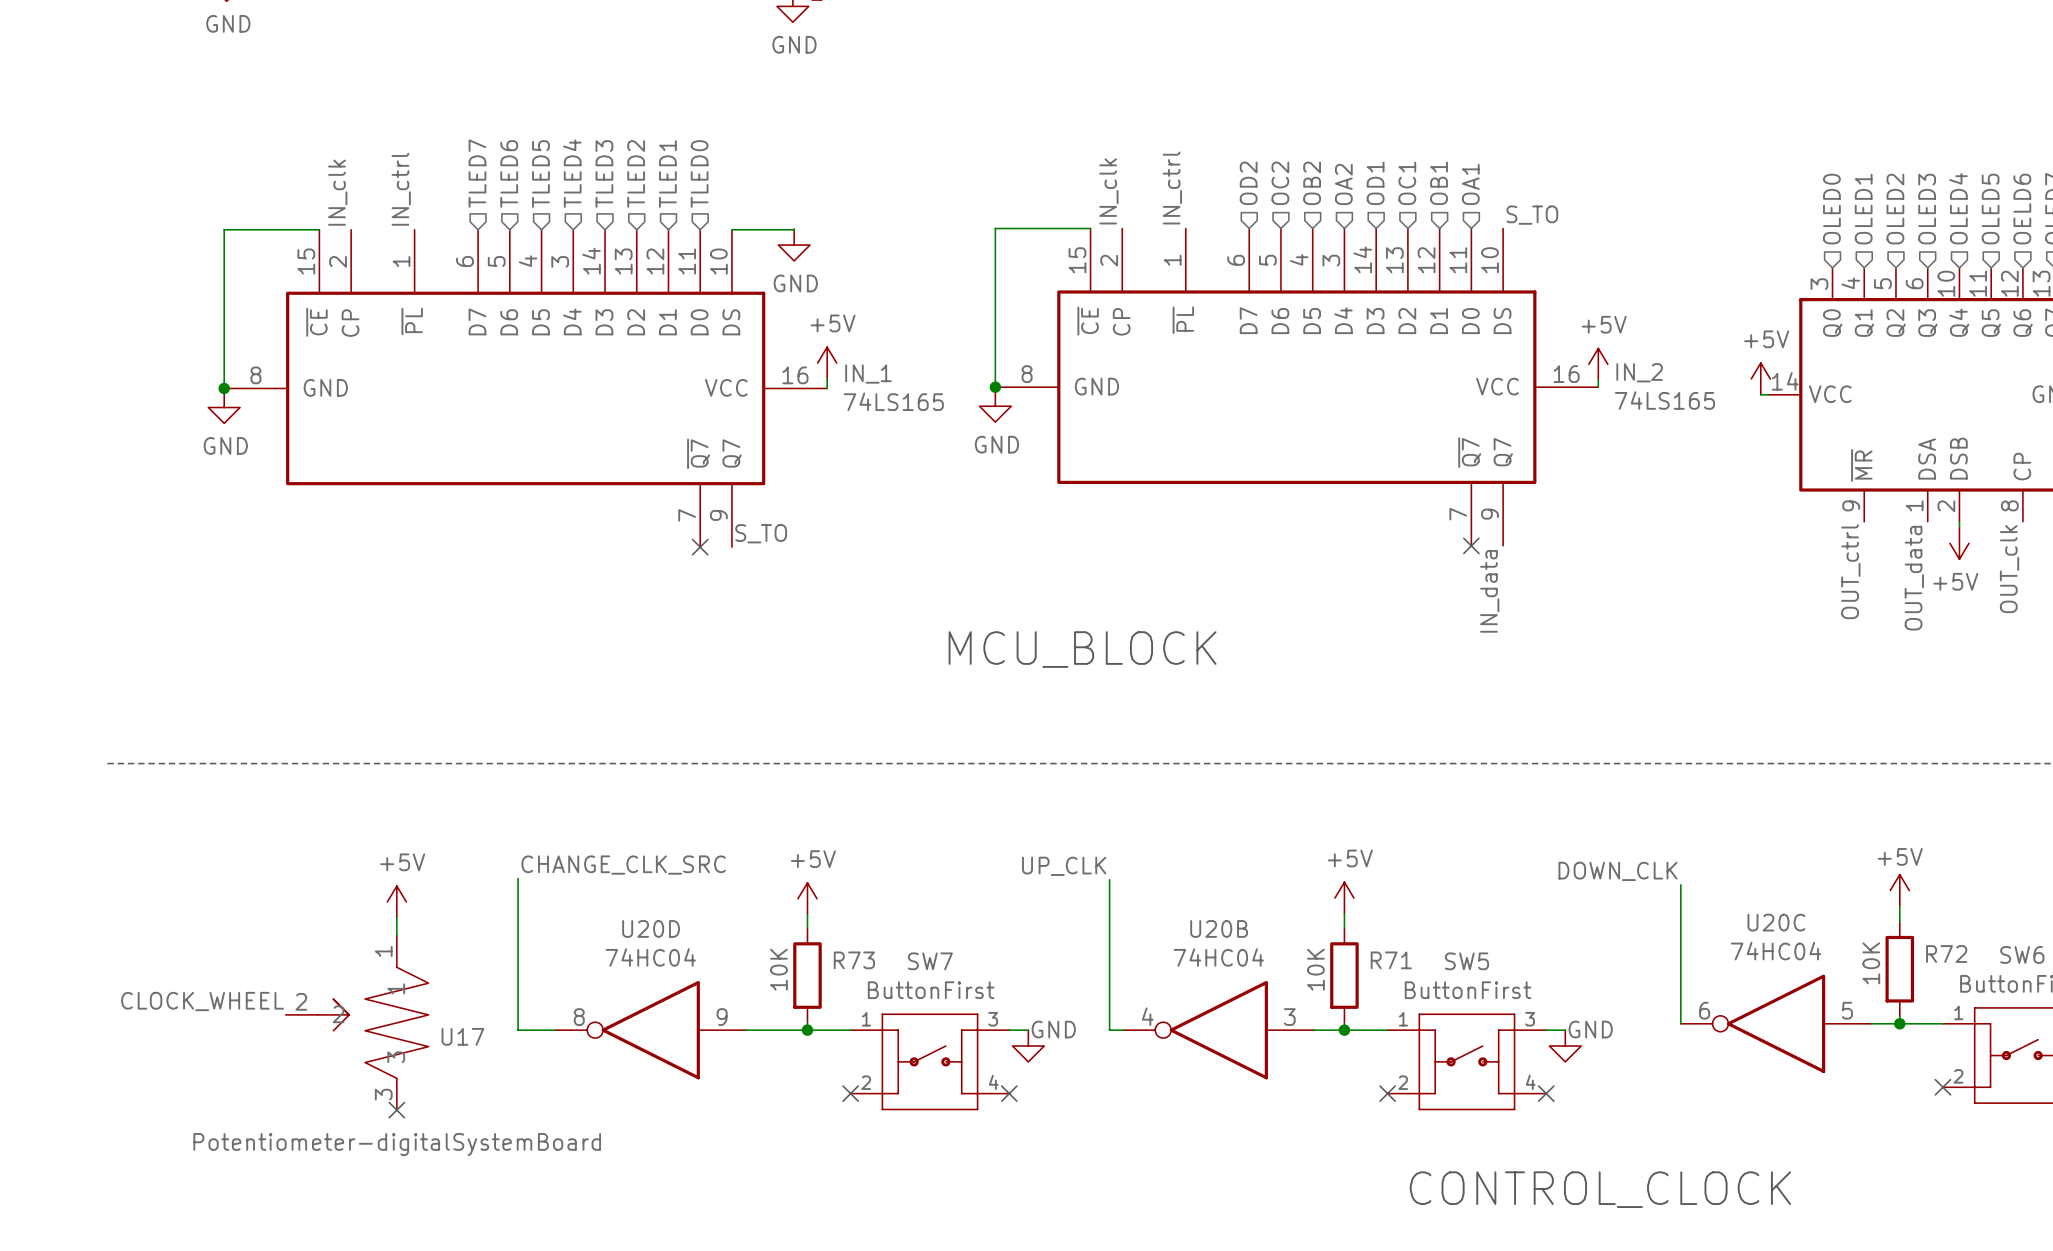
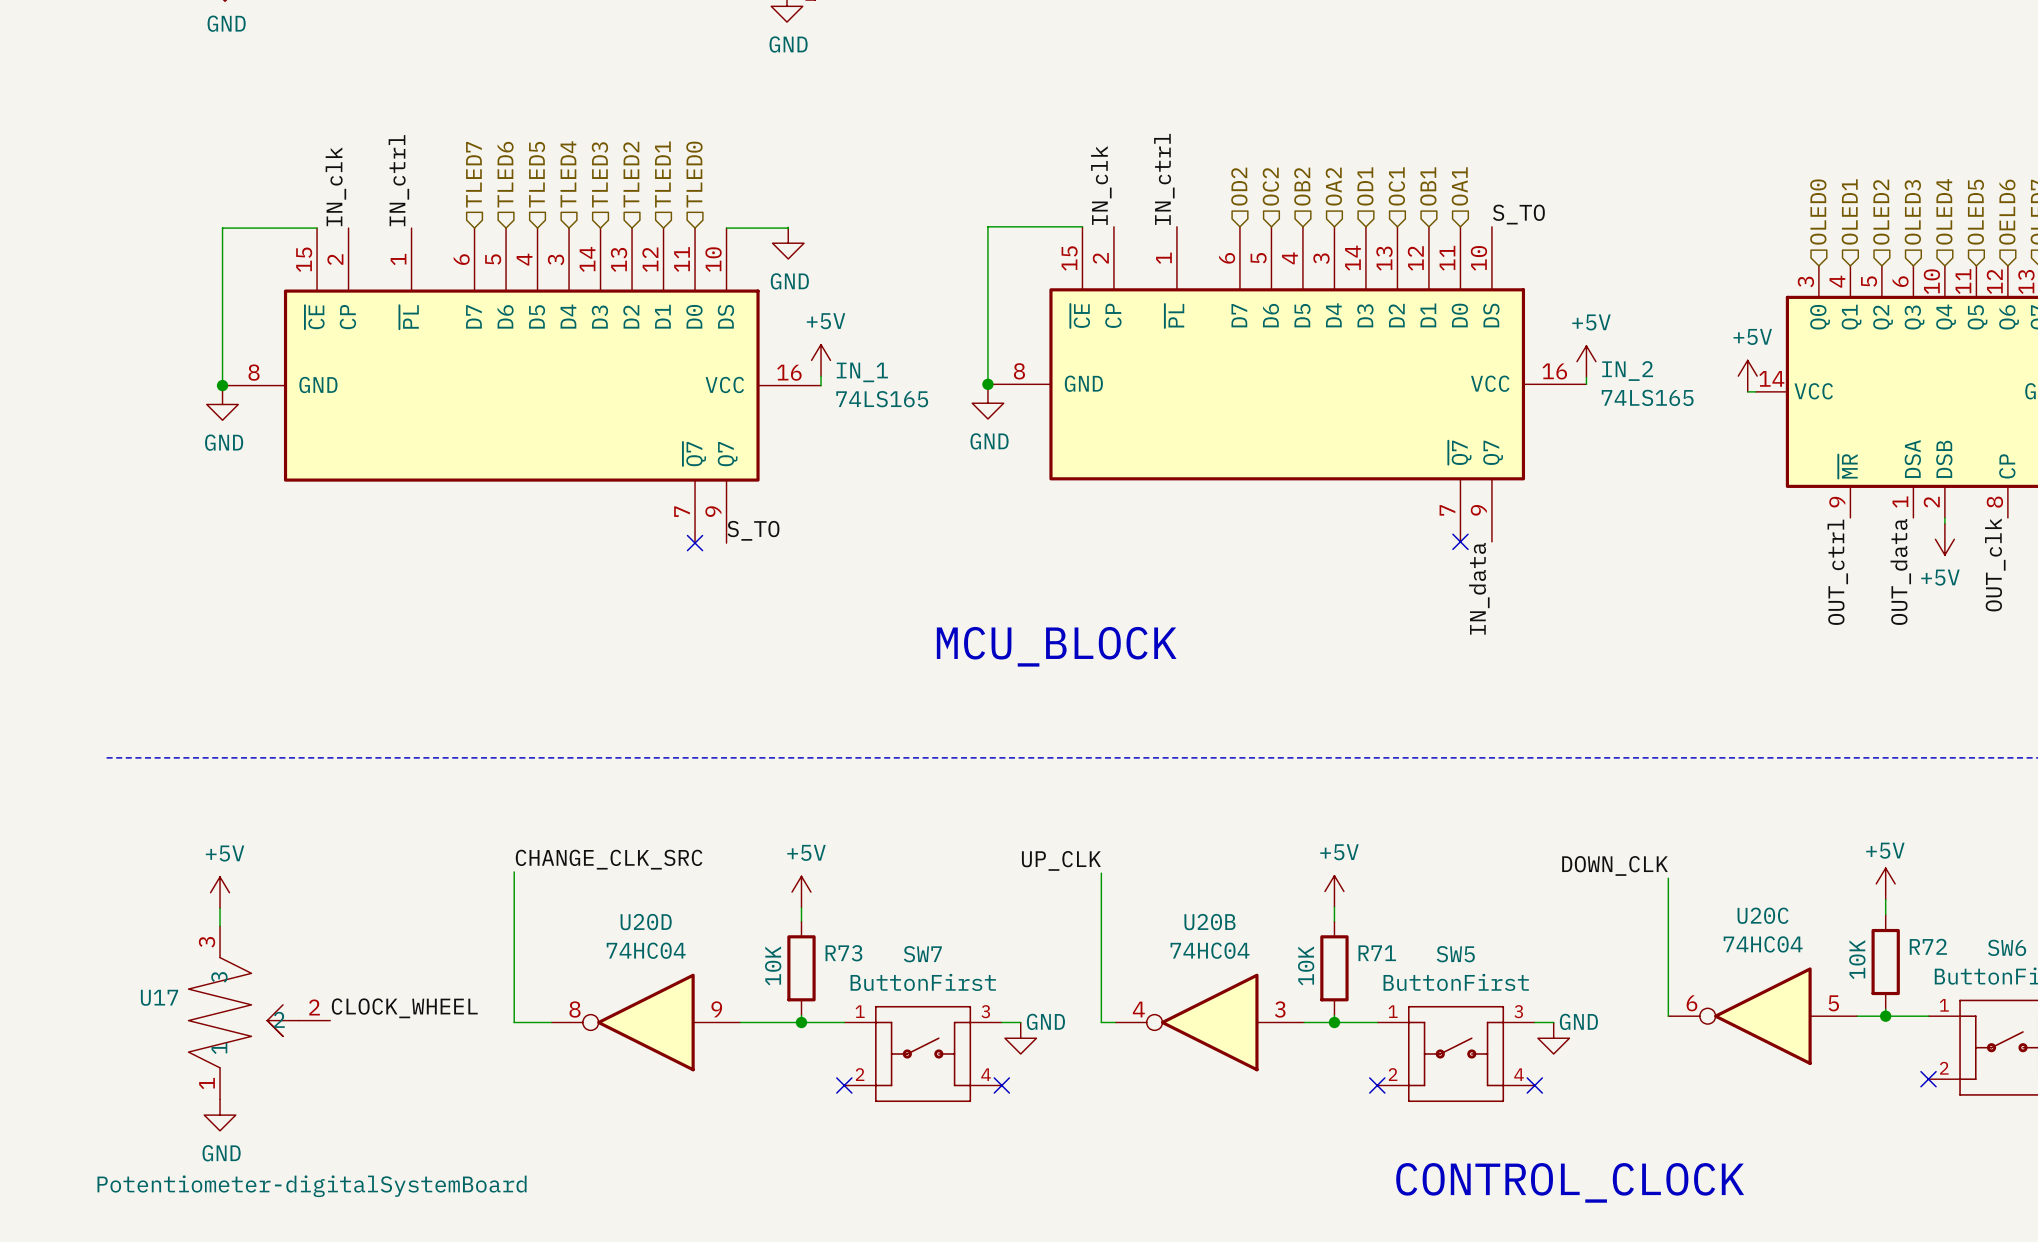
power symbol position: +5V (396, 901) -> +5V (220, 892)
wire: (396, 917) (396, 935) -> (220, 908) (220, 926)
label position: CLOCK_WHEEL (202, 1001) -> CLOCK_WHEEL (404, 1008)
U17 rotation: 0° (373, 1022) -> 180° (243, 1012)
no-connect mark: (396, 1110) -> none
power symbol: none -> GND (220, 1115)
U17 value position: Potentiometer-digitalSystemBoard (397, 1144) -> Potentiometer-digitalSystemBoard (312, 1186)

